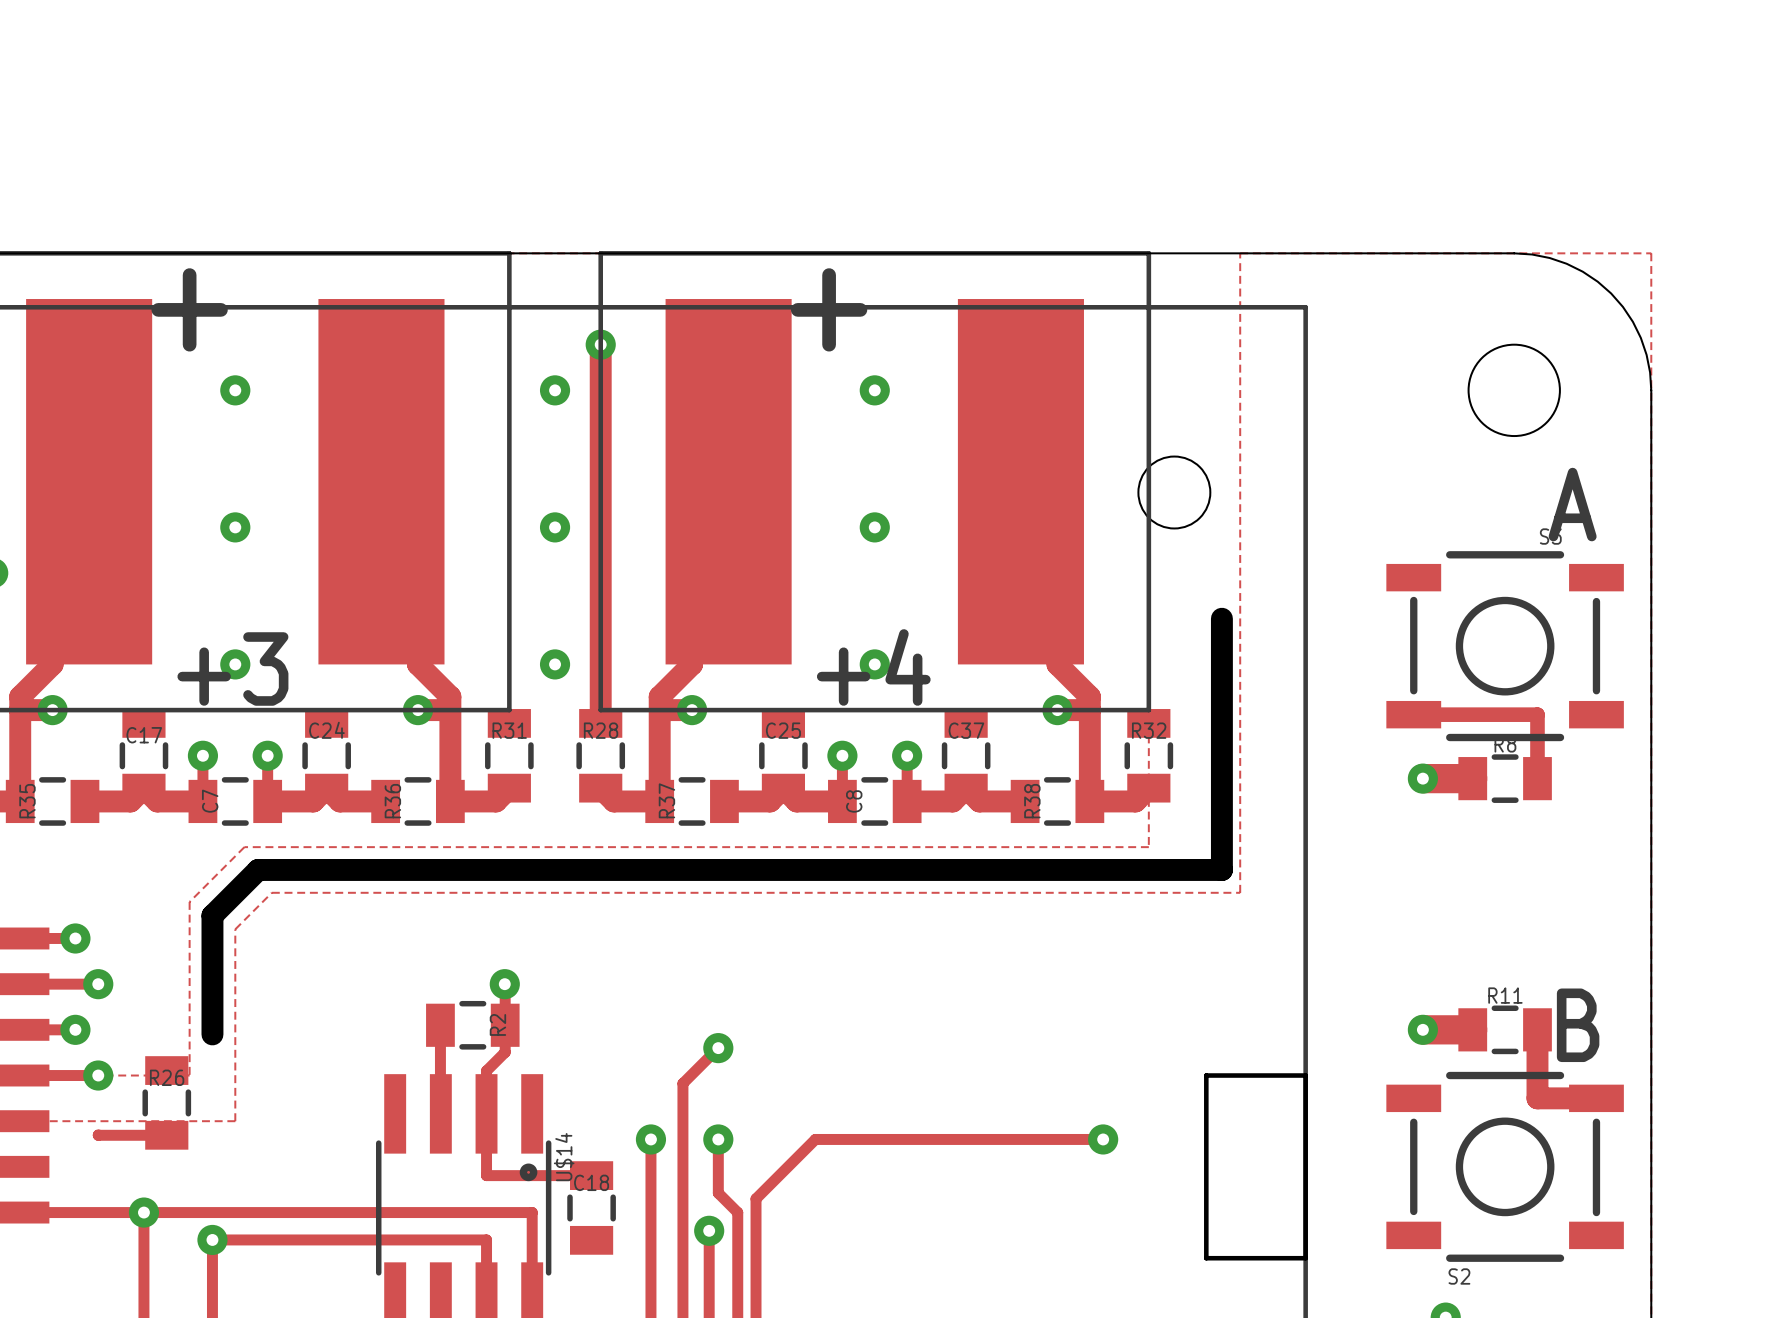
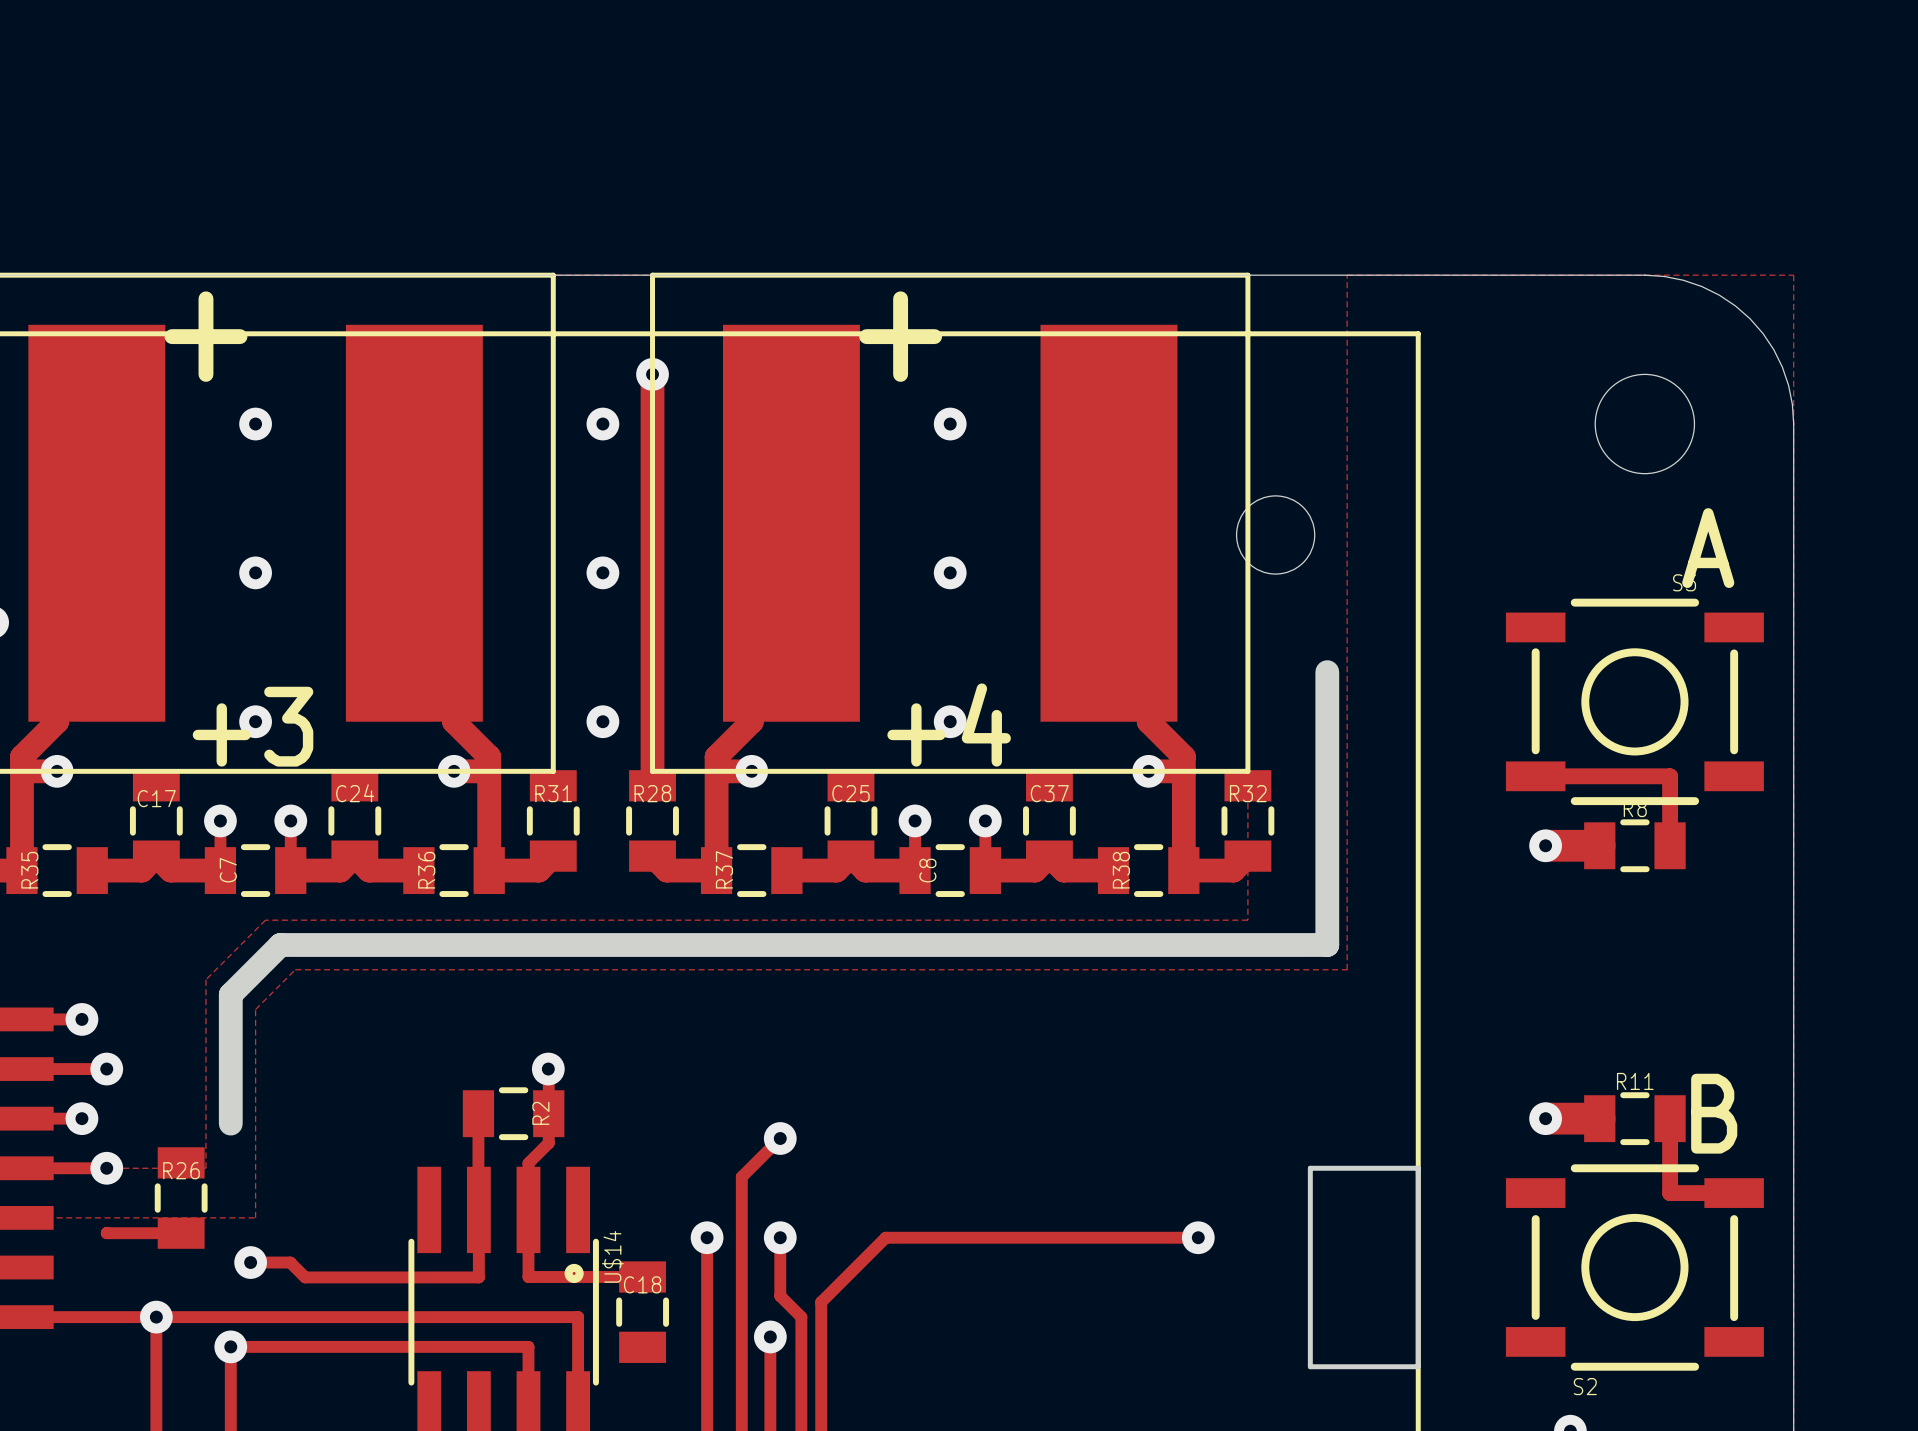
track width: thick (1537, 1029) (1537, 1098) (1596, 1098) -> thin (1670, 1118) (1670, 1193) (1734, 1193)
track: none -> (478, 1209) (478, 1277) (305, 1277) (290, 1262) (250, 1262)
via: none -> (250, 1262)

